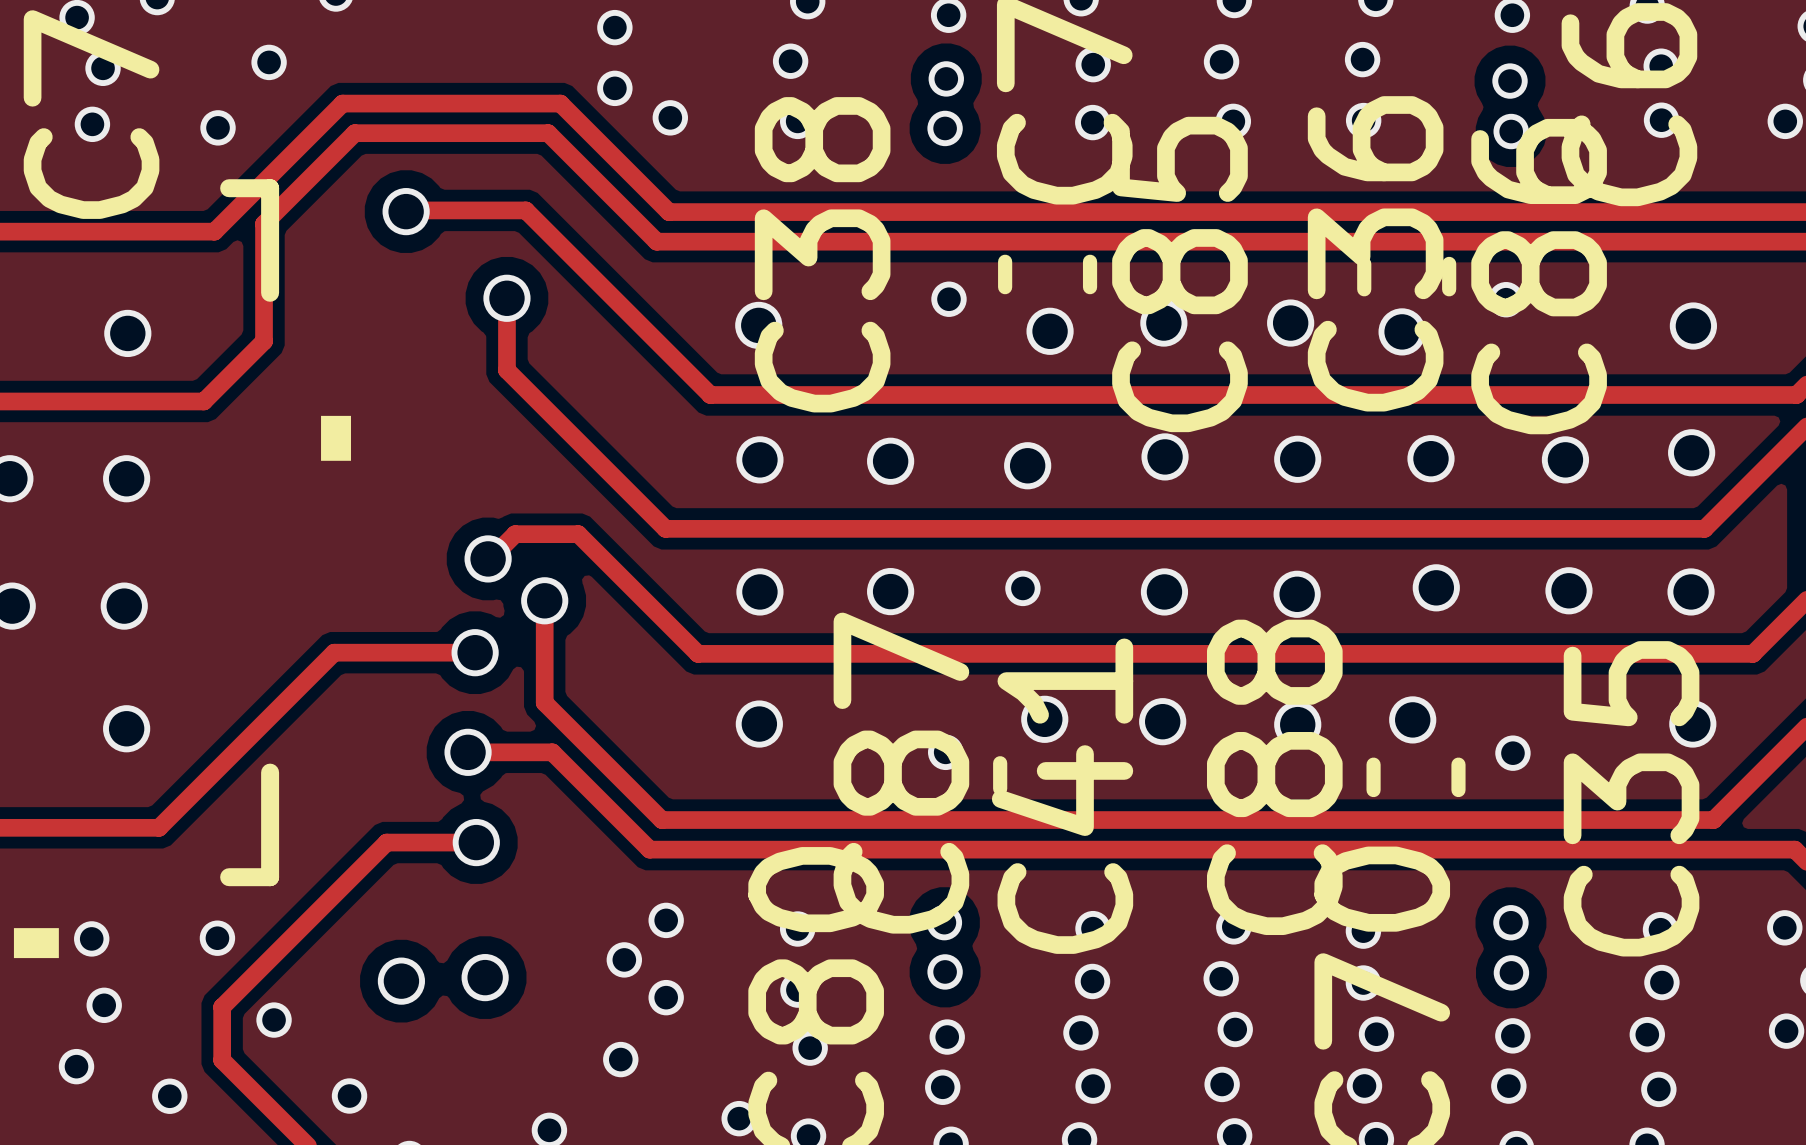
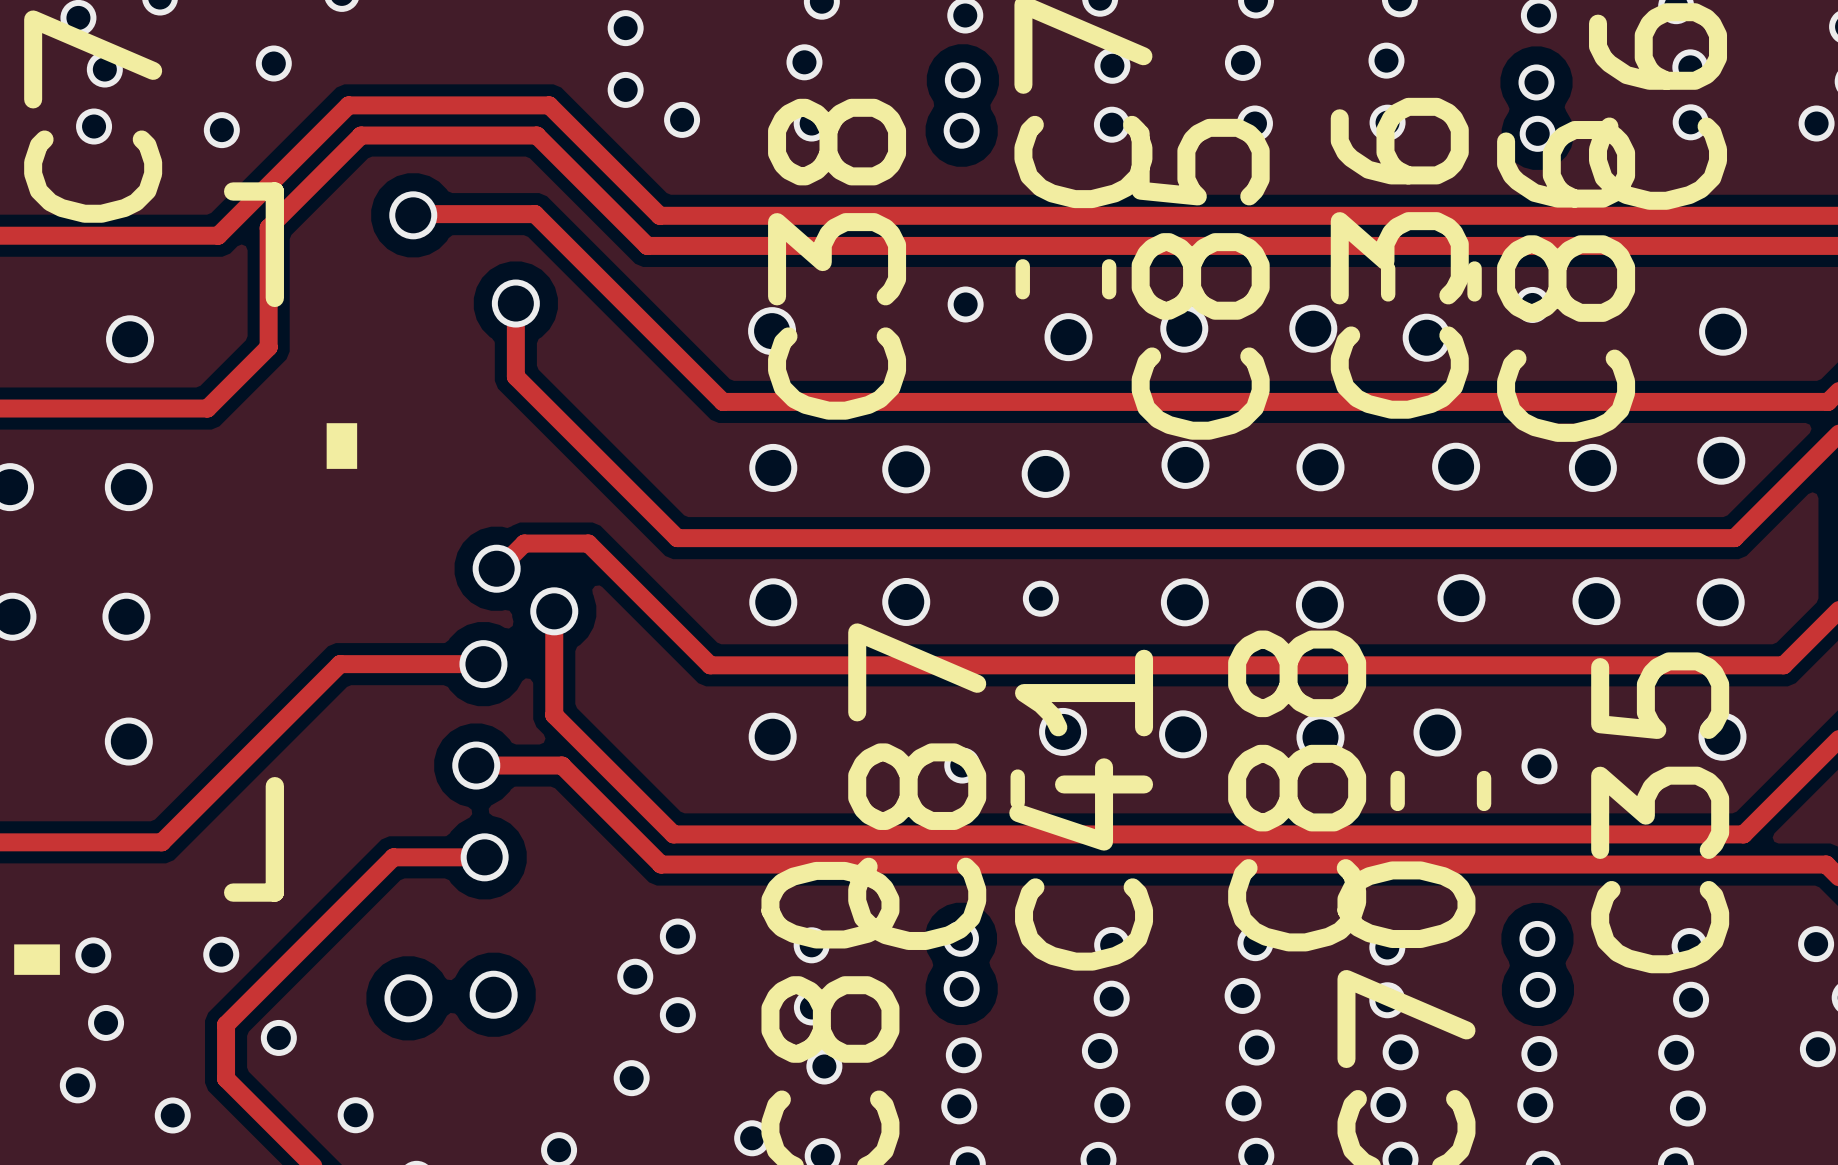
track: (539, 103) (560, 103) (669, 212) -> (549, 105) (659, 215) (680, 215)
track: (527, 133) (548, 133) (656, 241) -> (536, 135) (647, 245) (668, 245)

